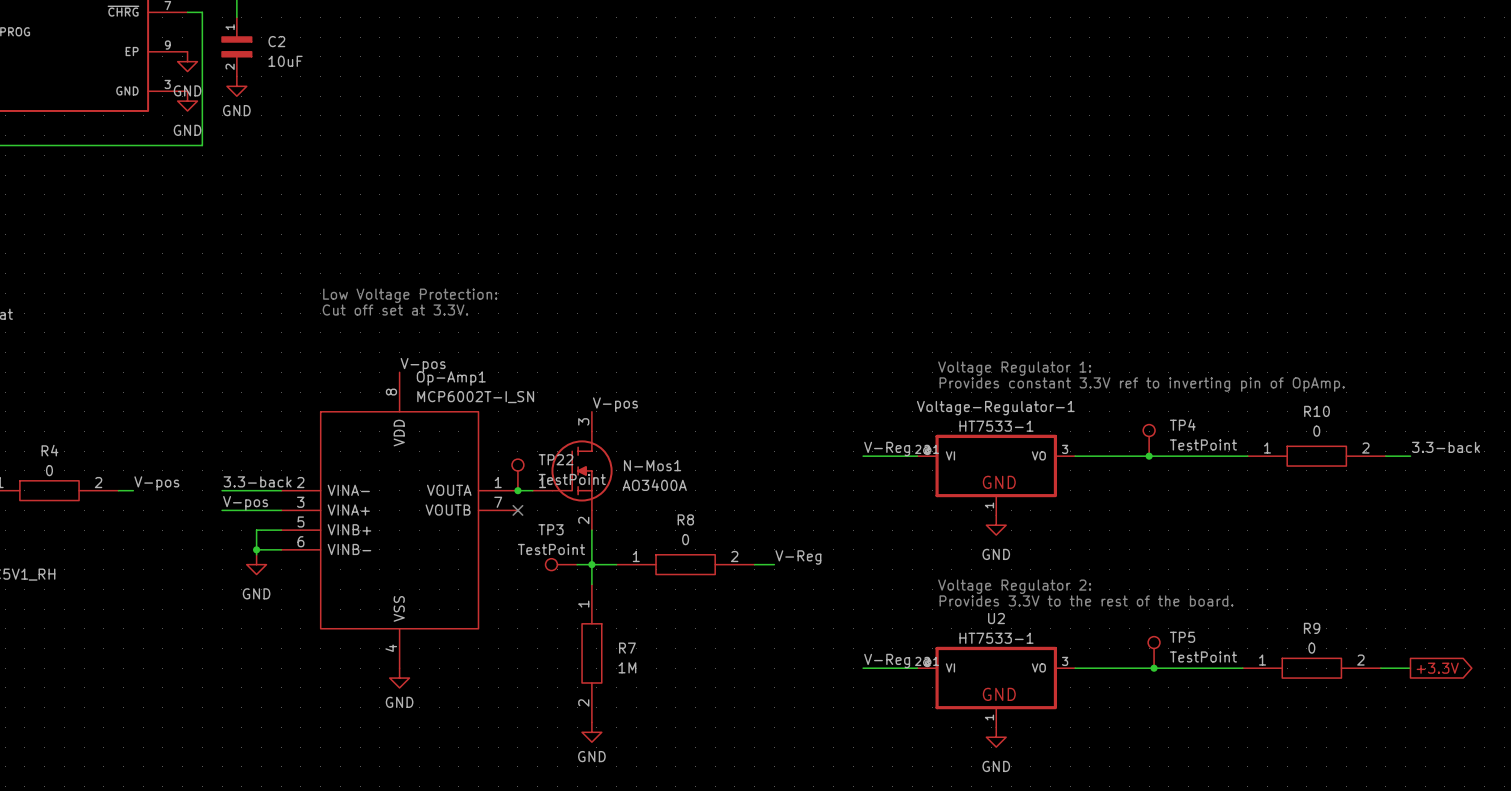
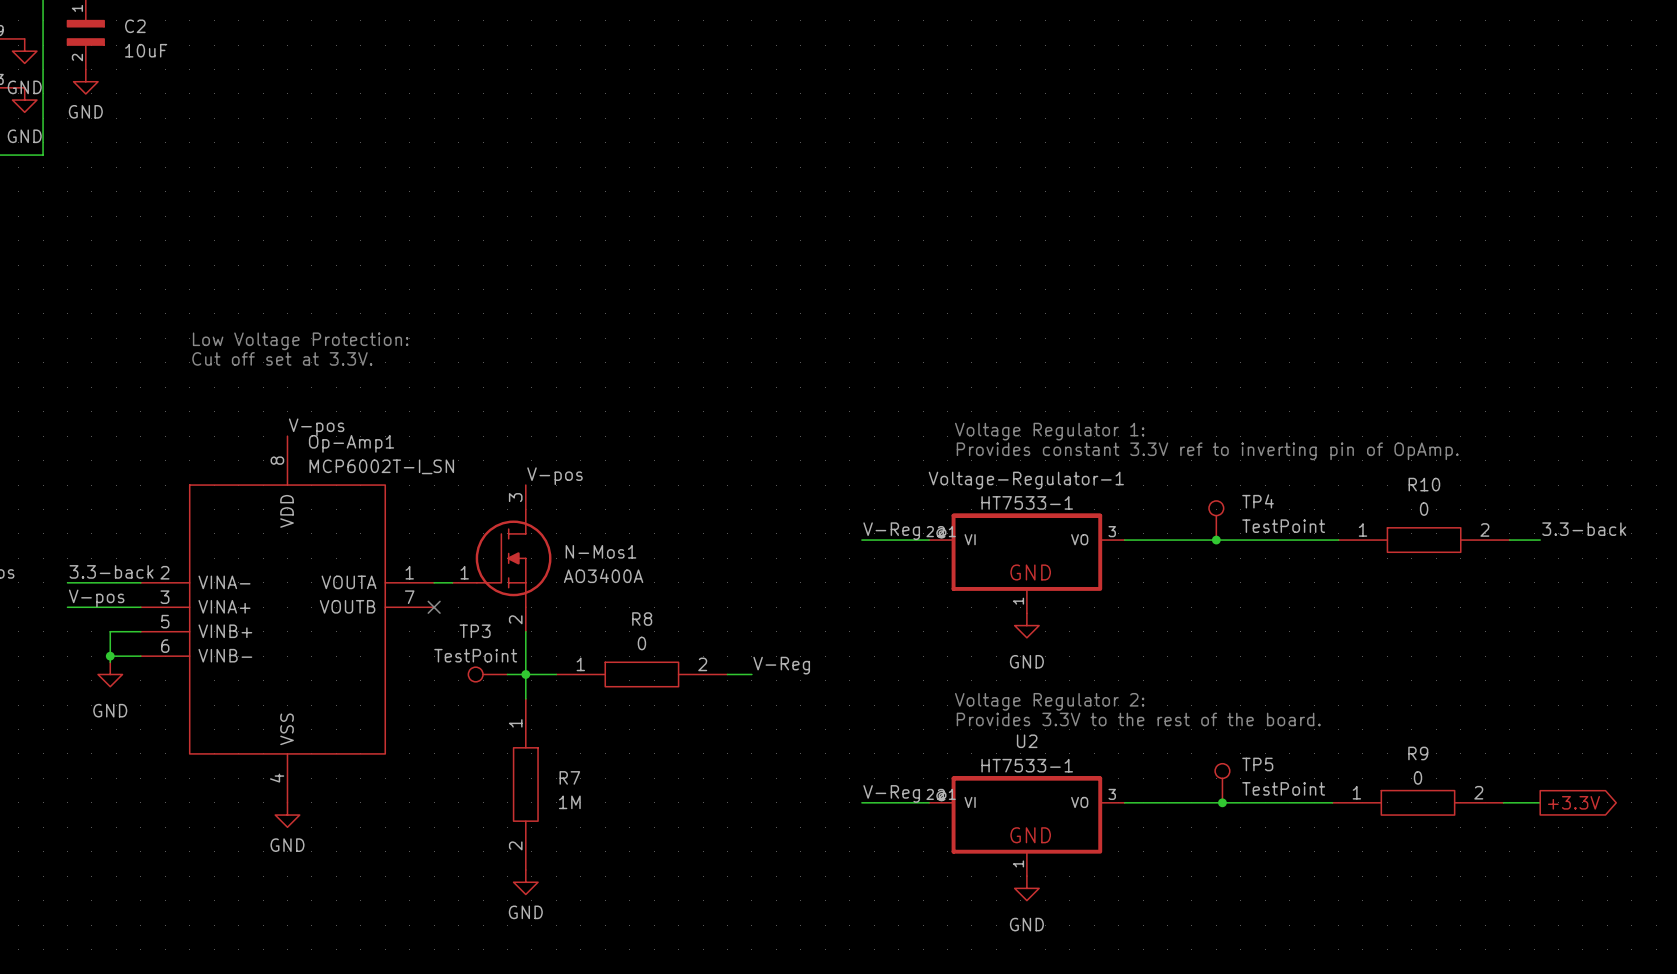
TP22: TestPoint (517, 474) -> none
junction: (517, 490) -> none

